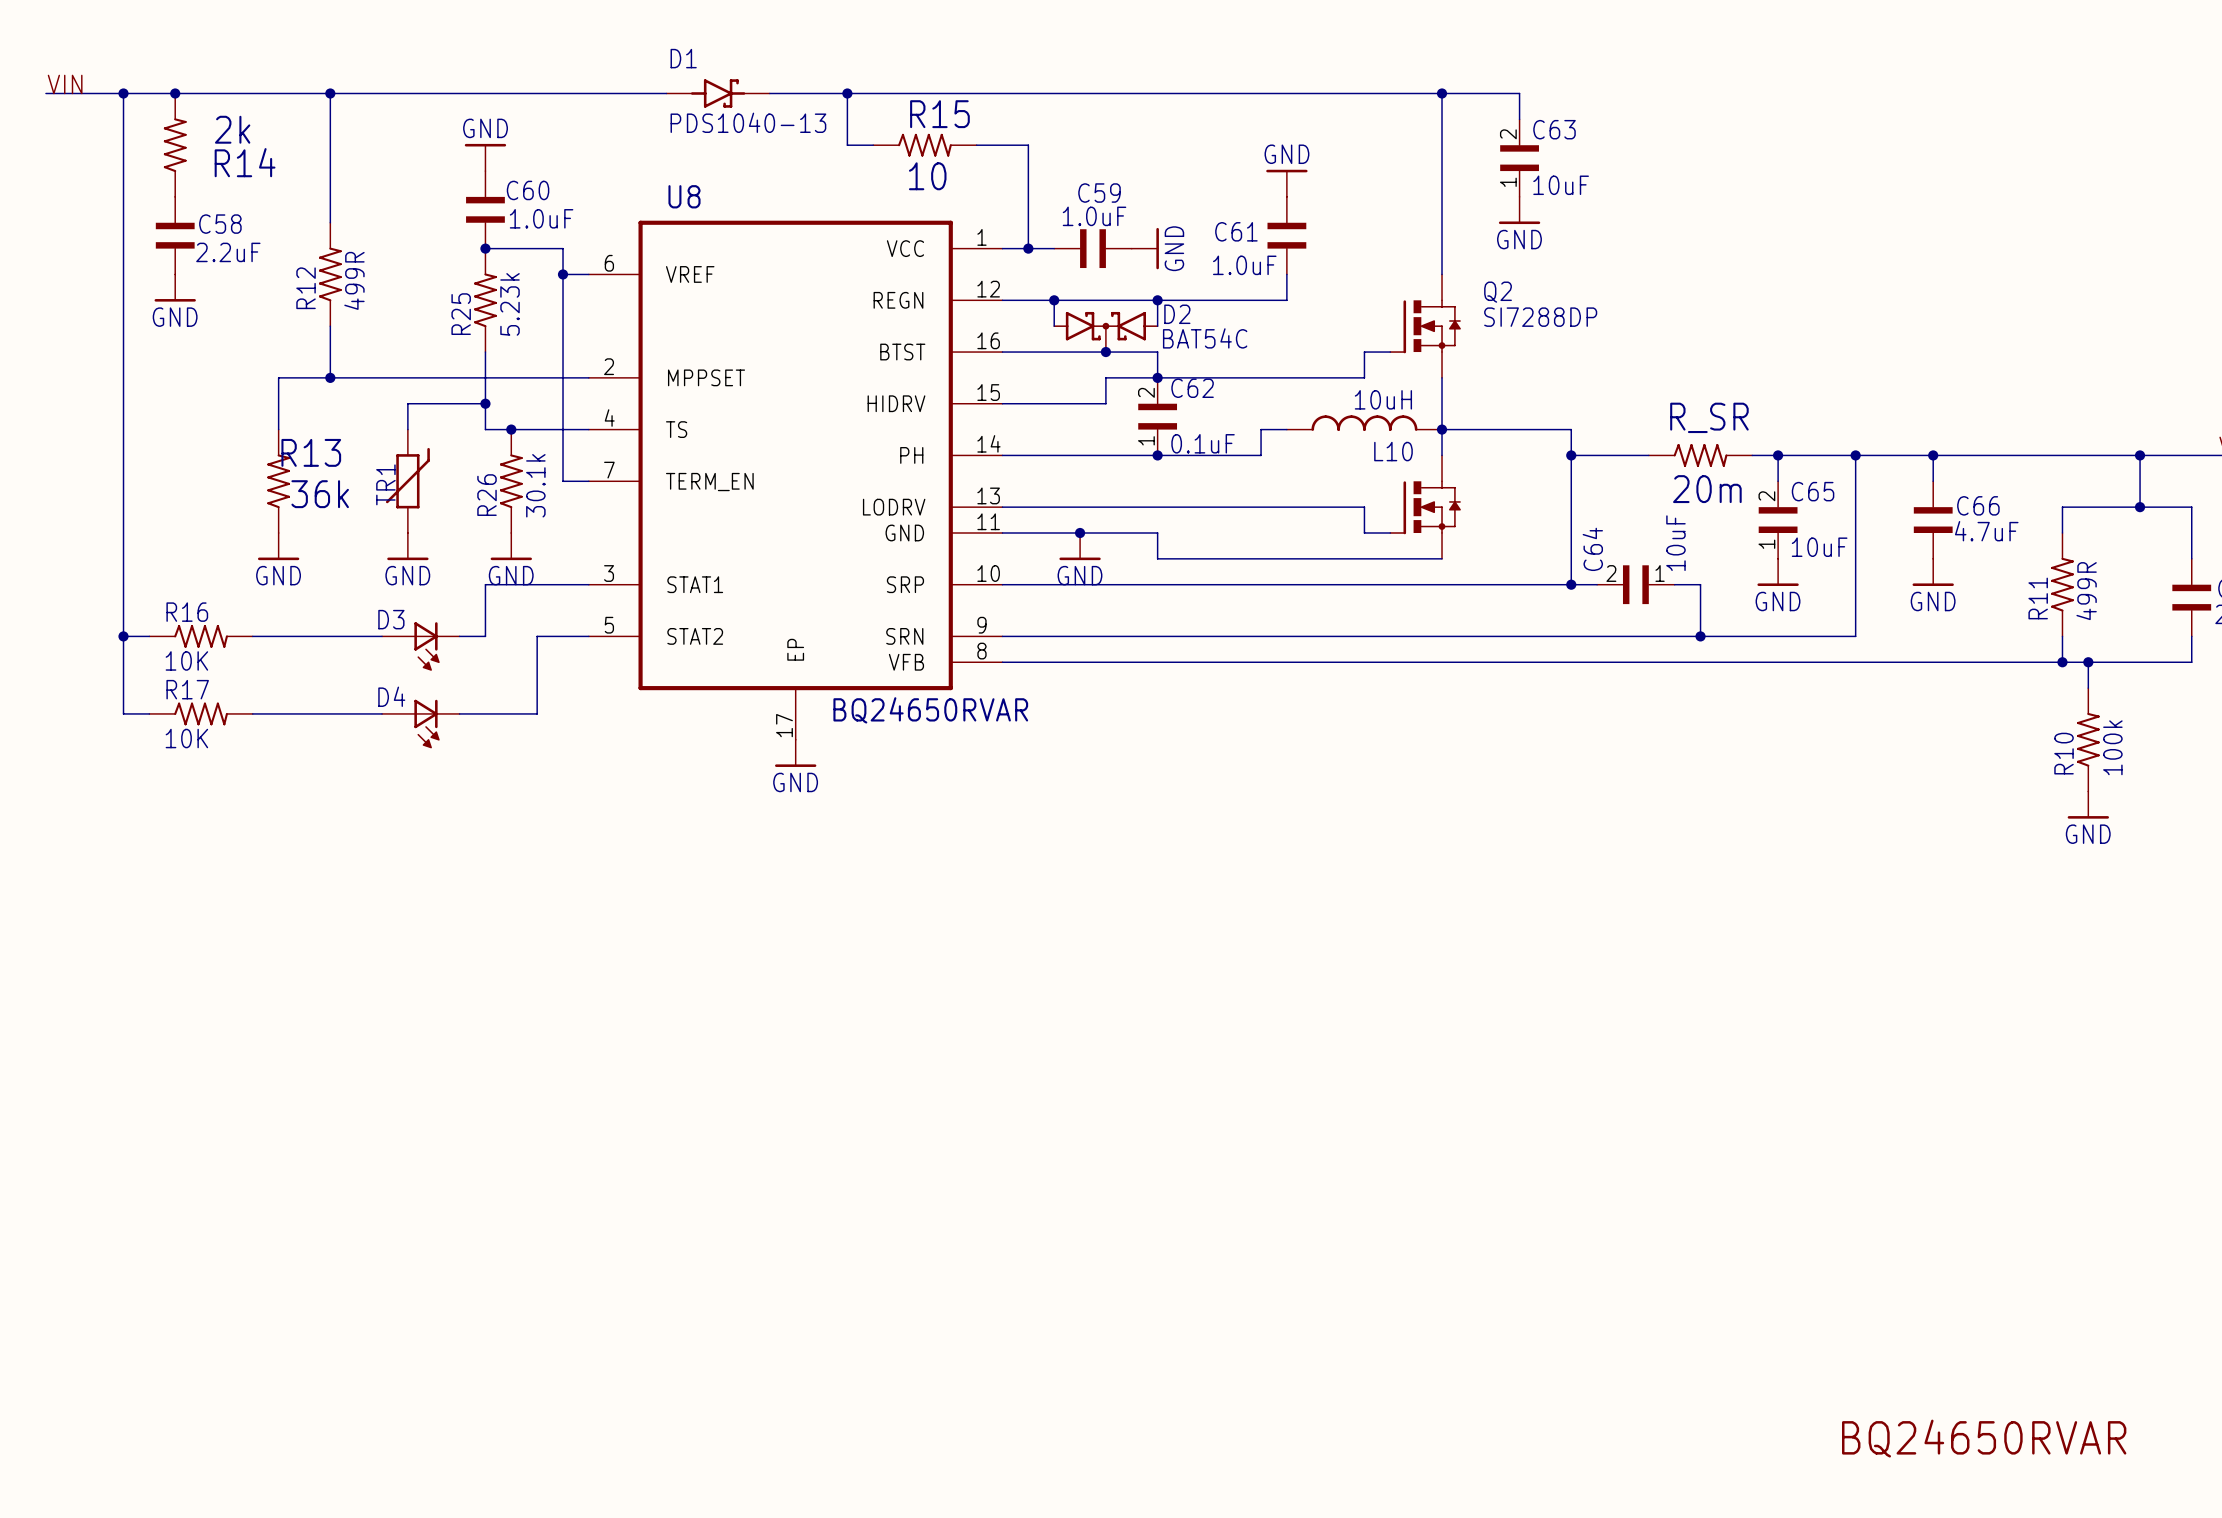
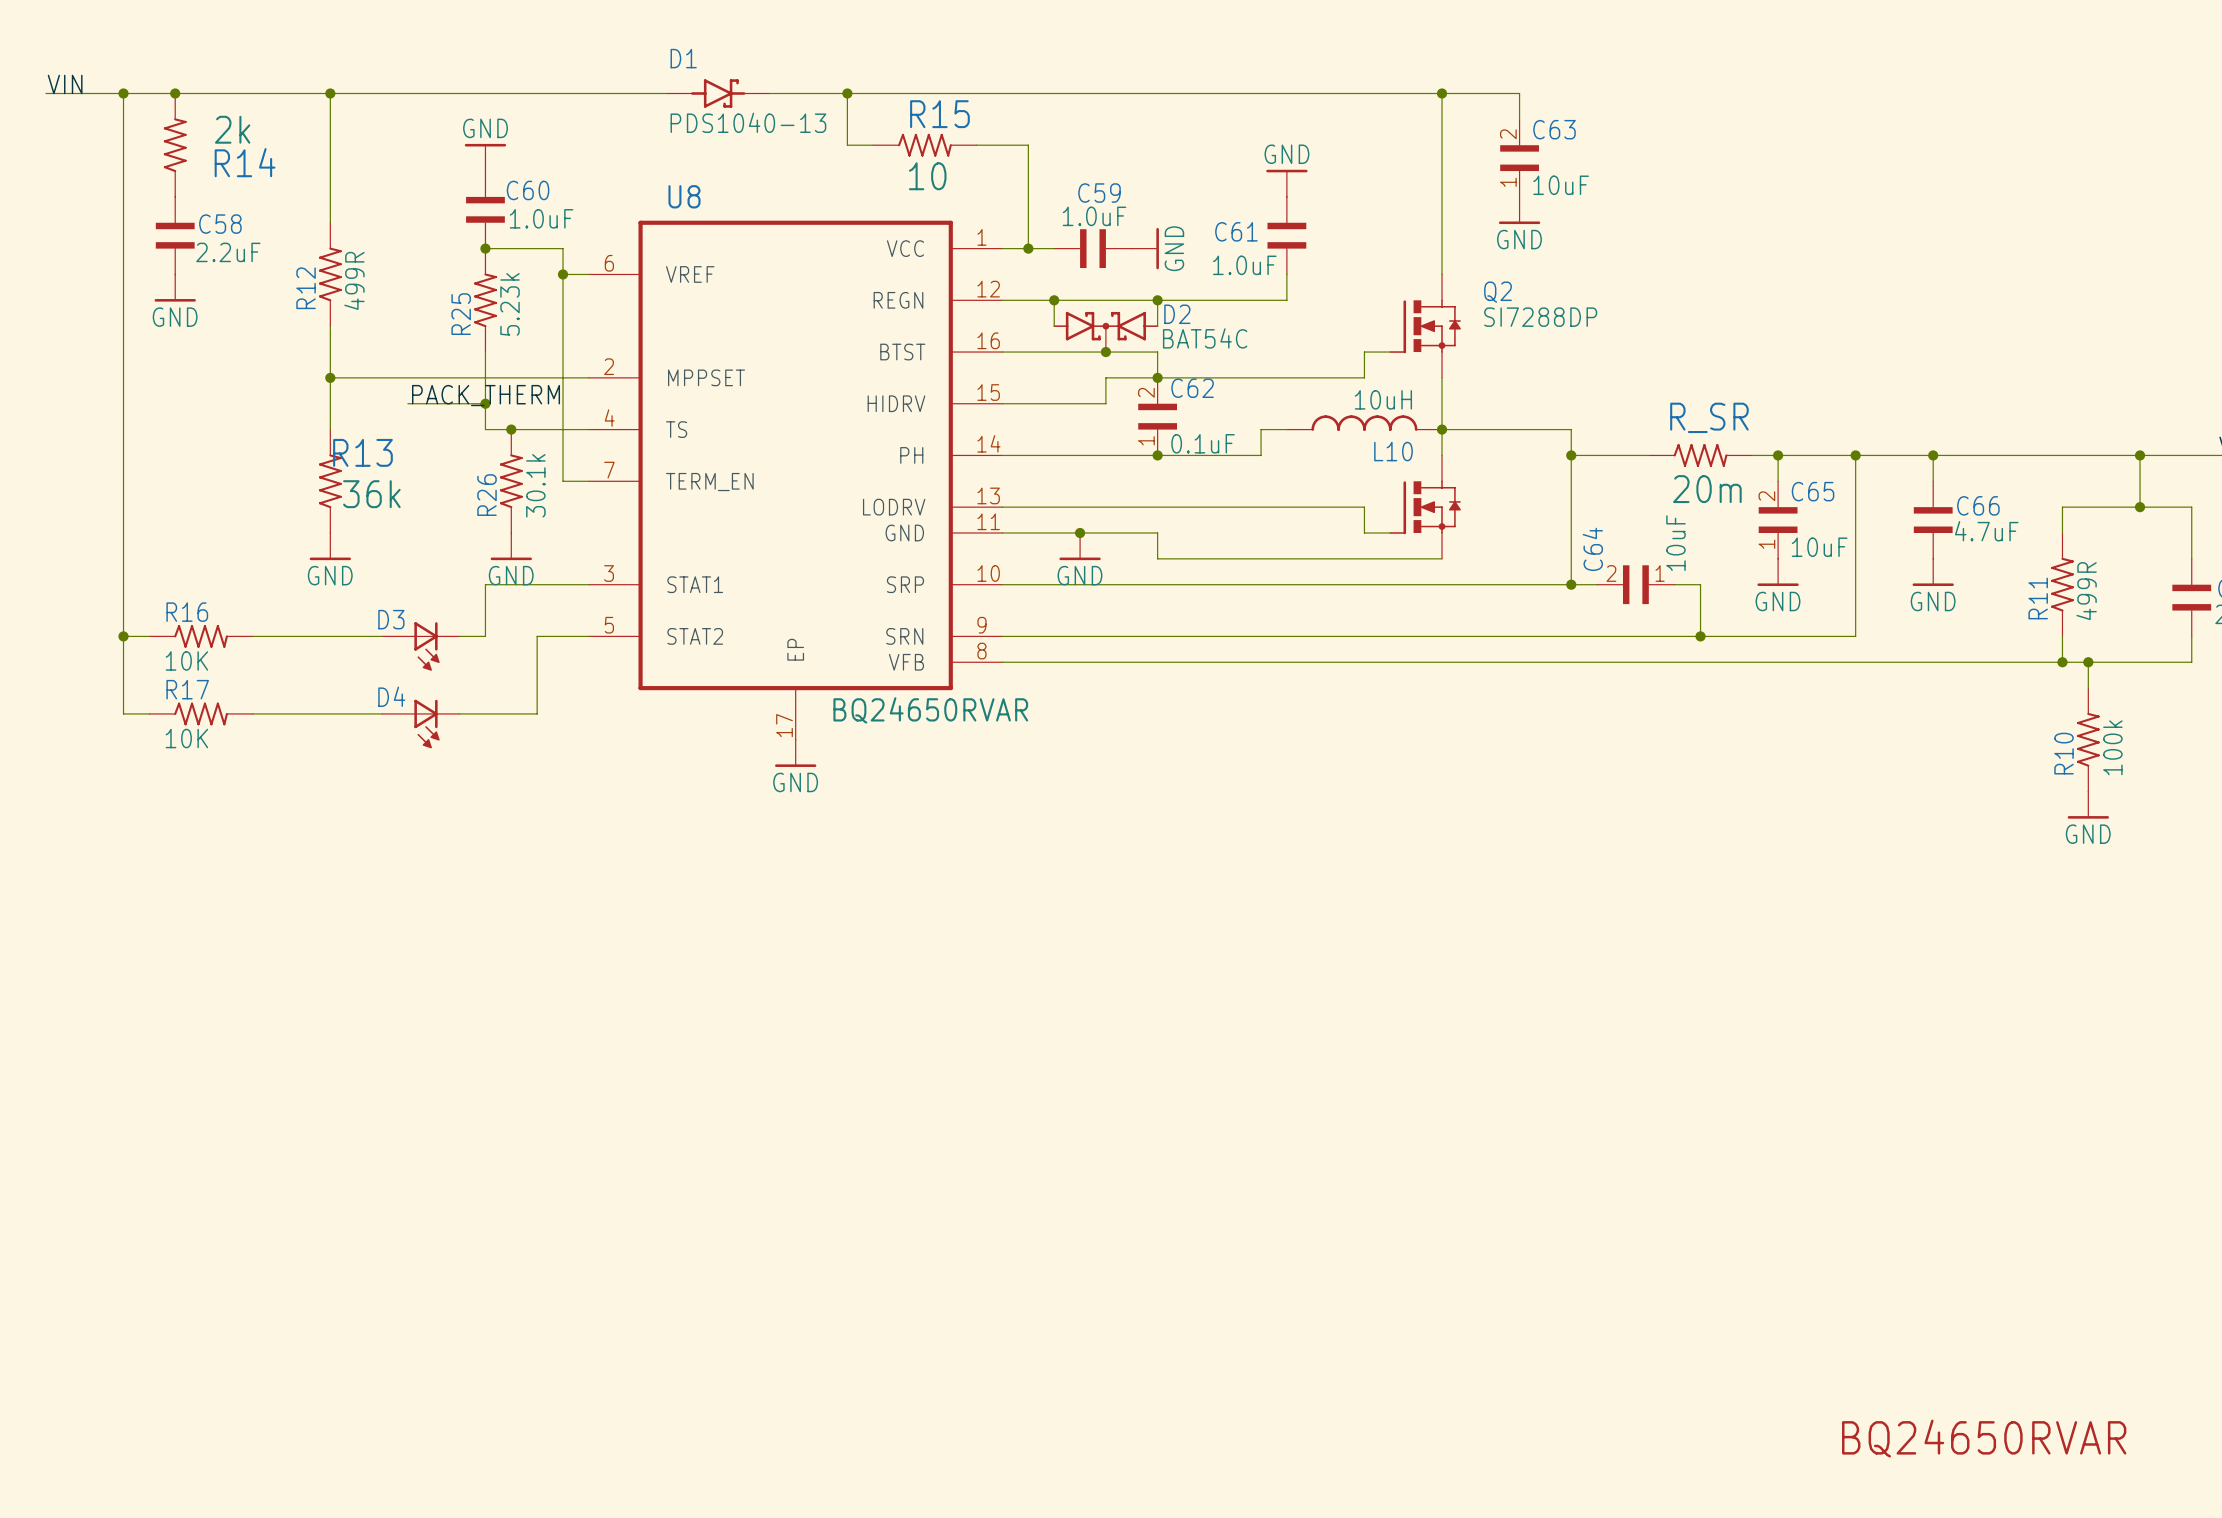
wire: (330, 377) (278, 377) (278, 429) -> (330, 377) (330, 429)
label: none -> PACK_THERM (486, 395)
wire: (407, 403) (407, 429) -> none
R13 position: (278, 481) -> (330, 481)
TR1: (407, 481) -> none
power symbol: GND (278, 546) -> none
power symbol: none -> GND (330, 546)
power symbol: GND (407, 546) -> none

